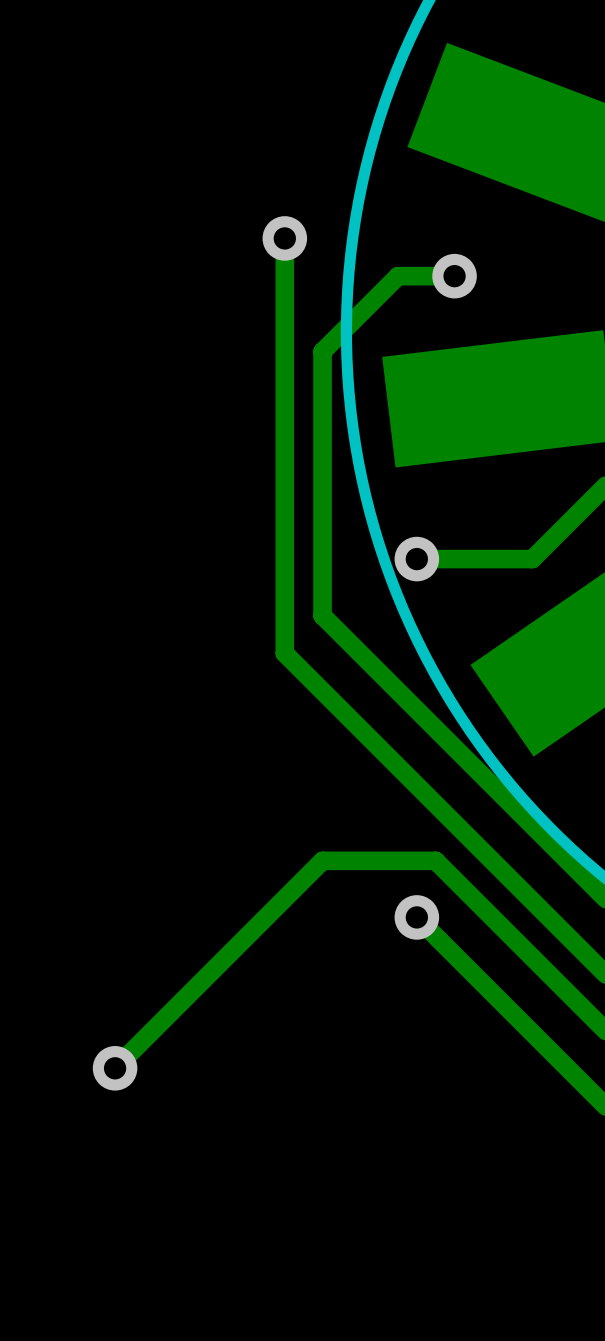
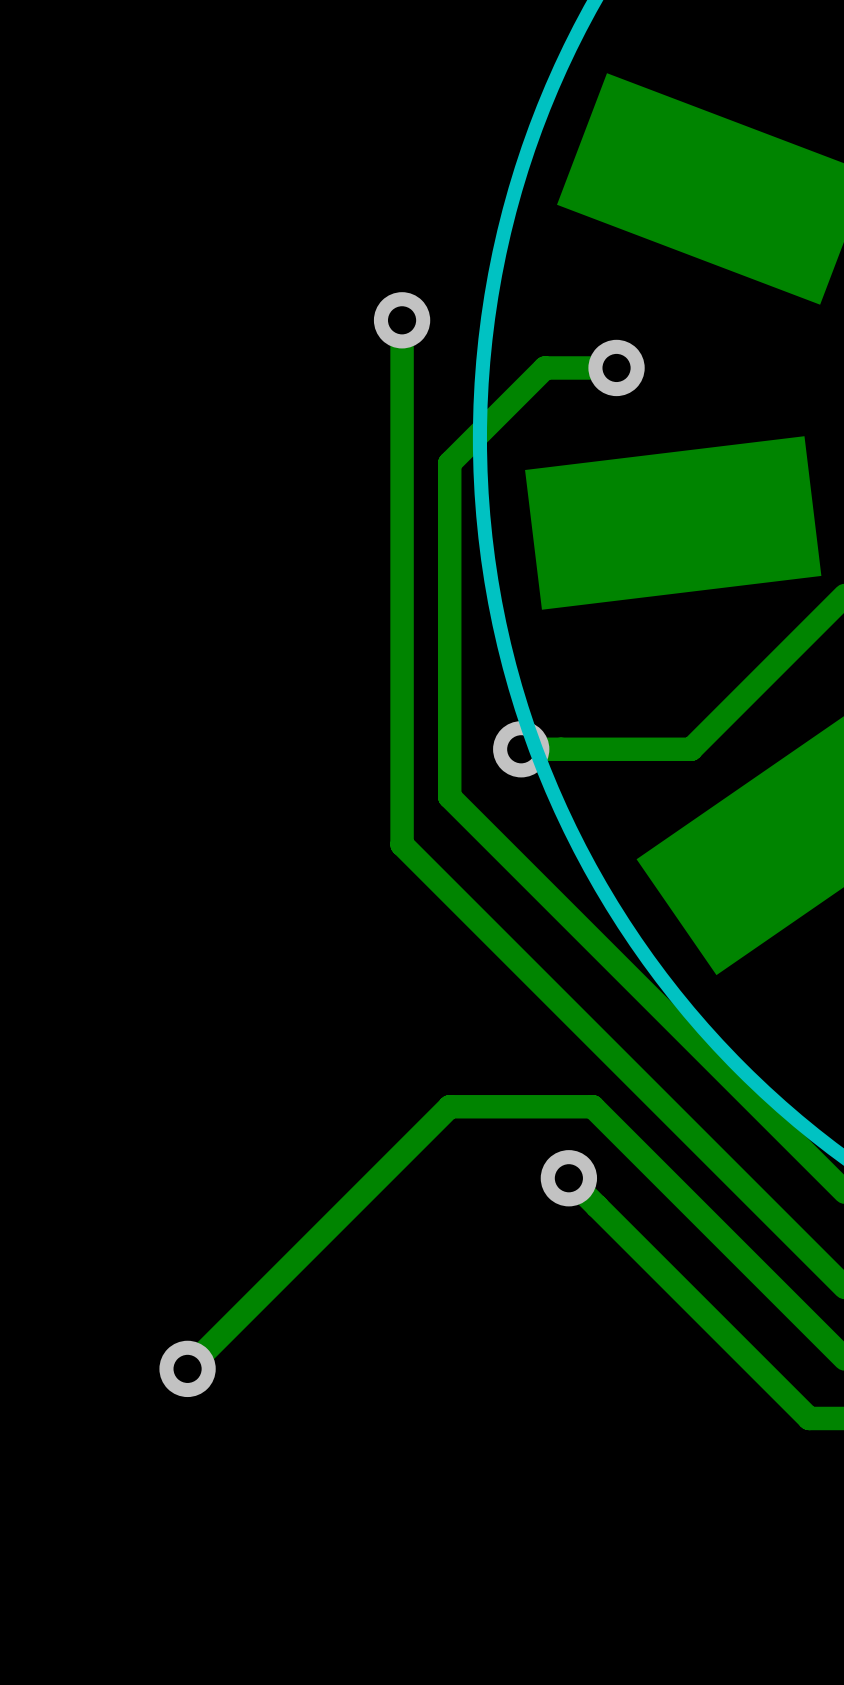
via position: (416, 559) -> (521, 749)
track: (532, 559) (416, 559) -> (714, 725) (691, 749) (521, 749)

